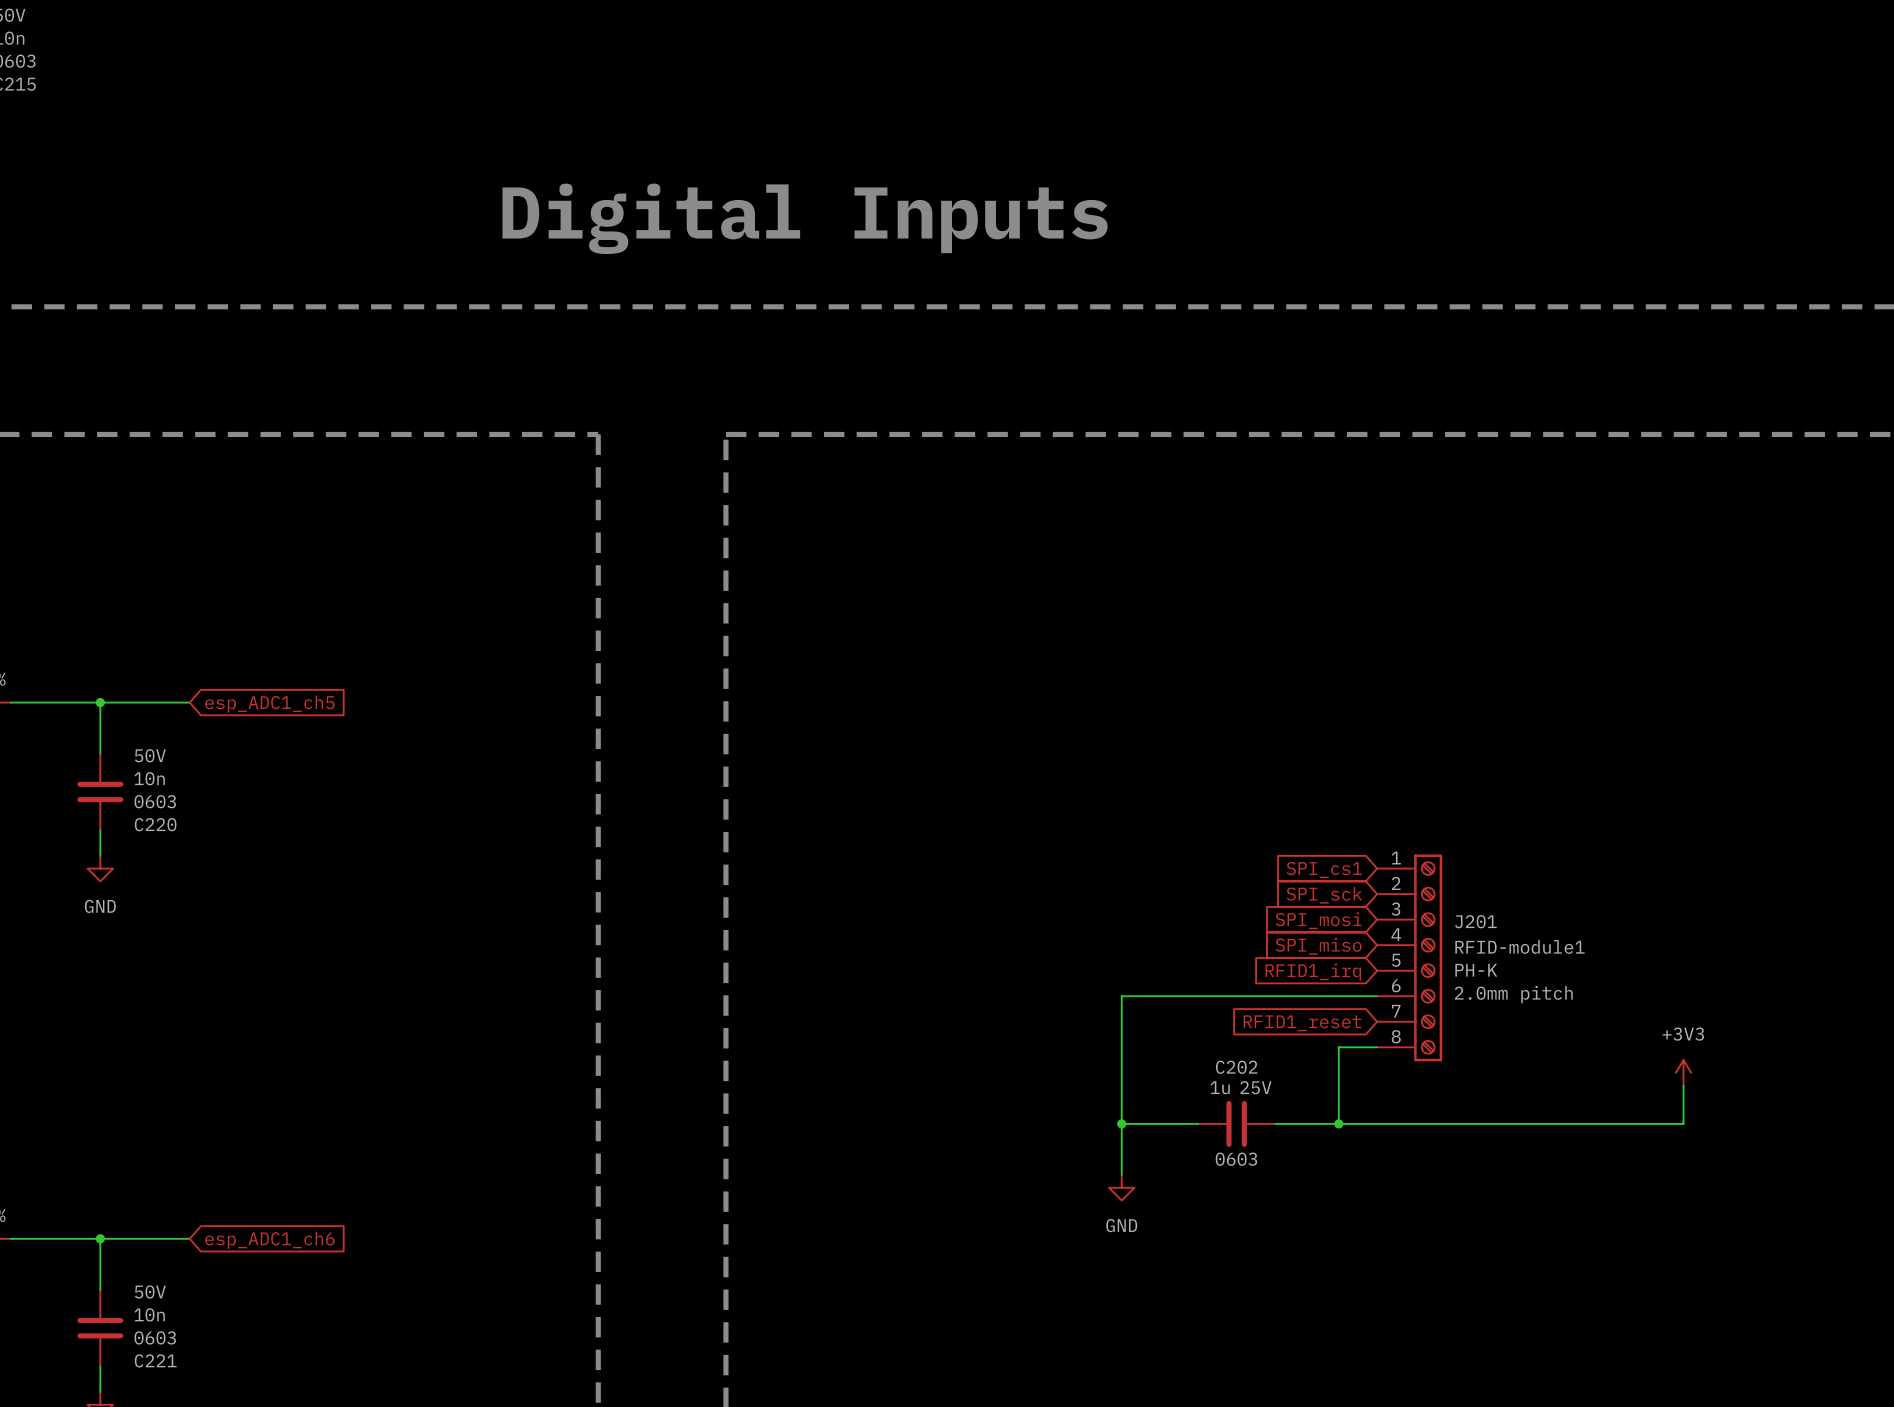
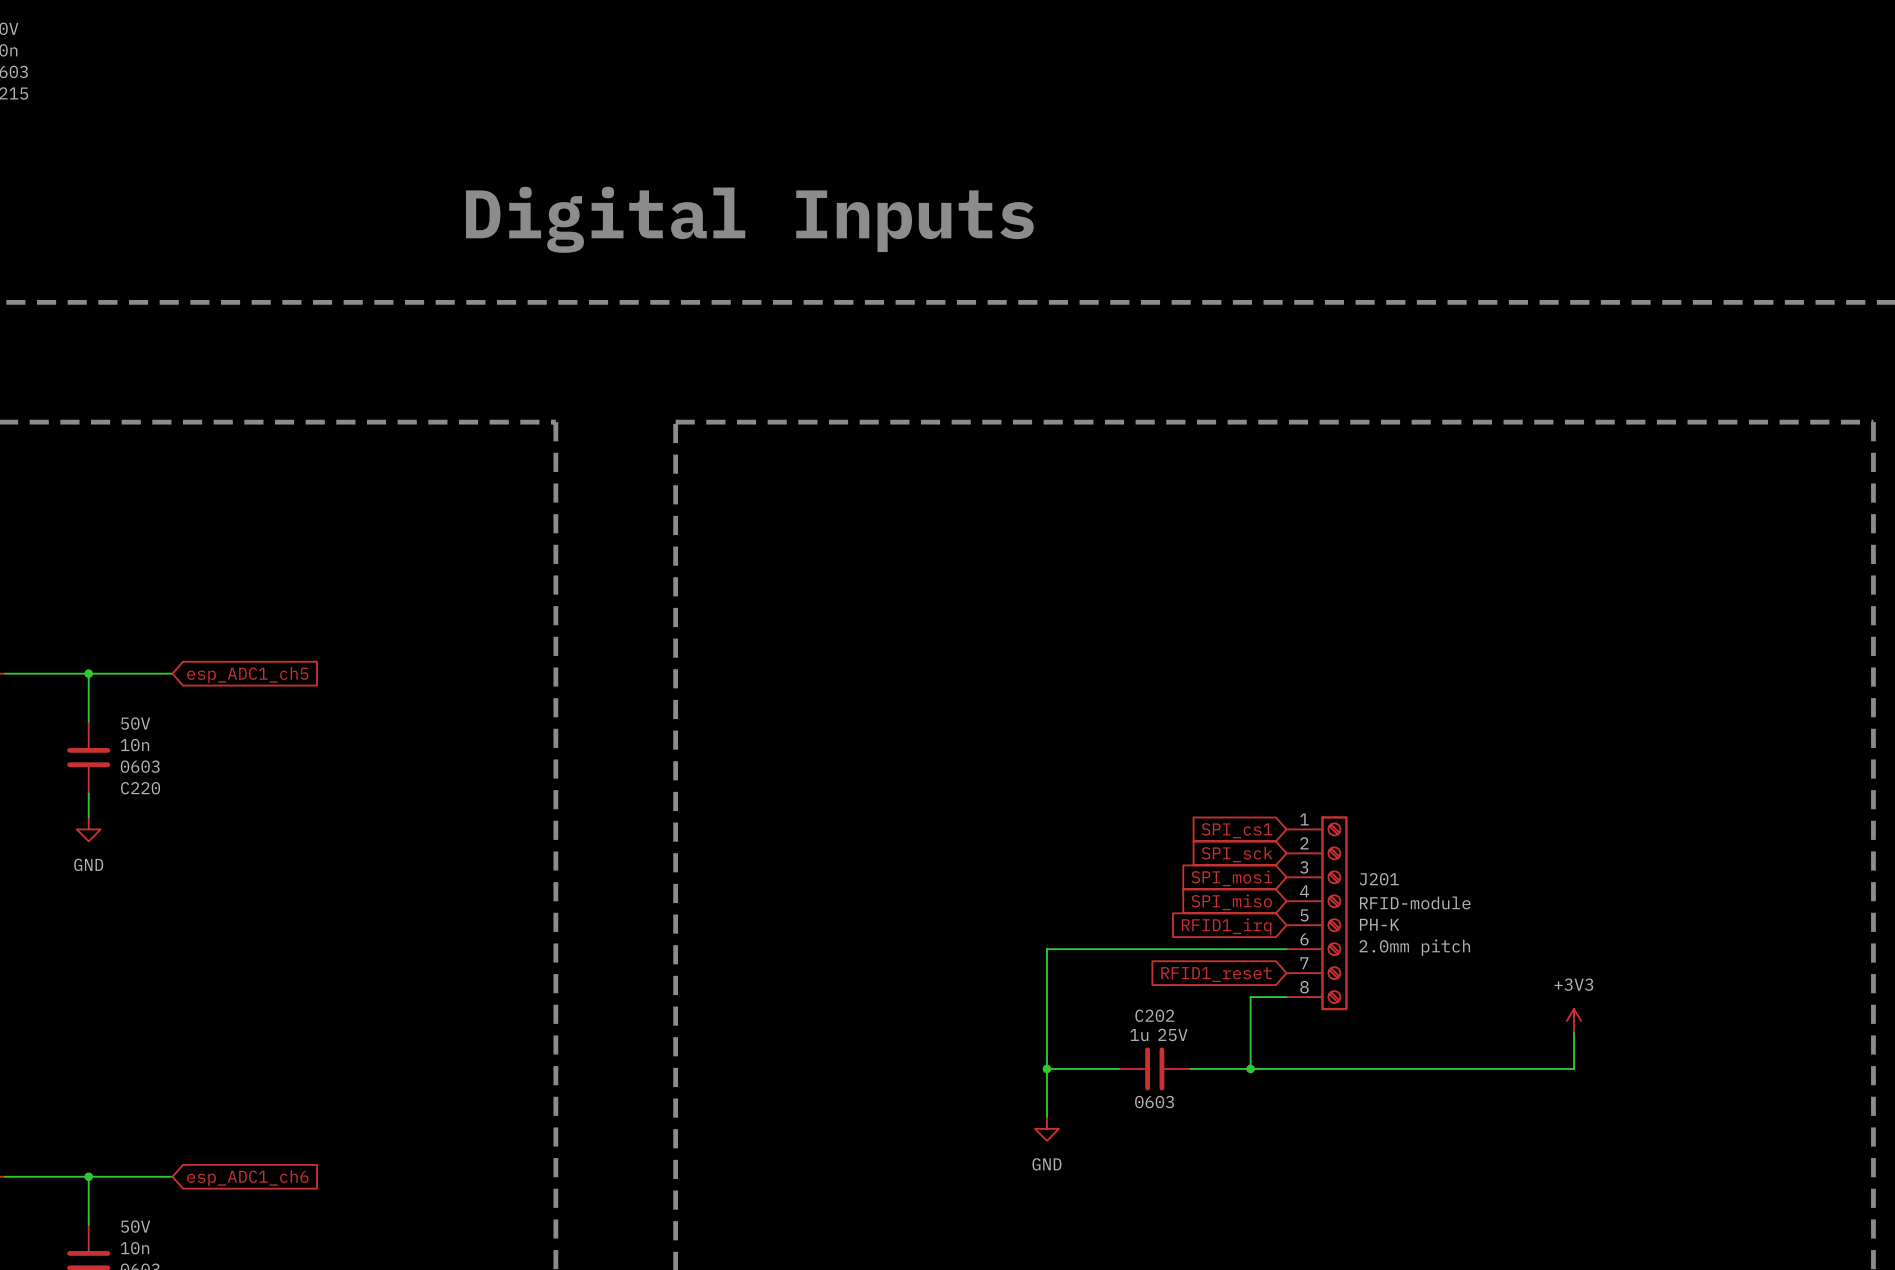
J201 value: RFID-module1 (1519, 946) -> RFID-module (1415, 902)

